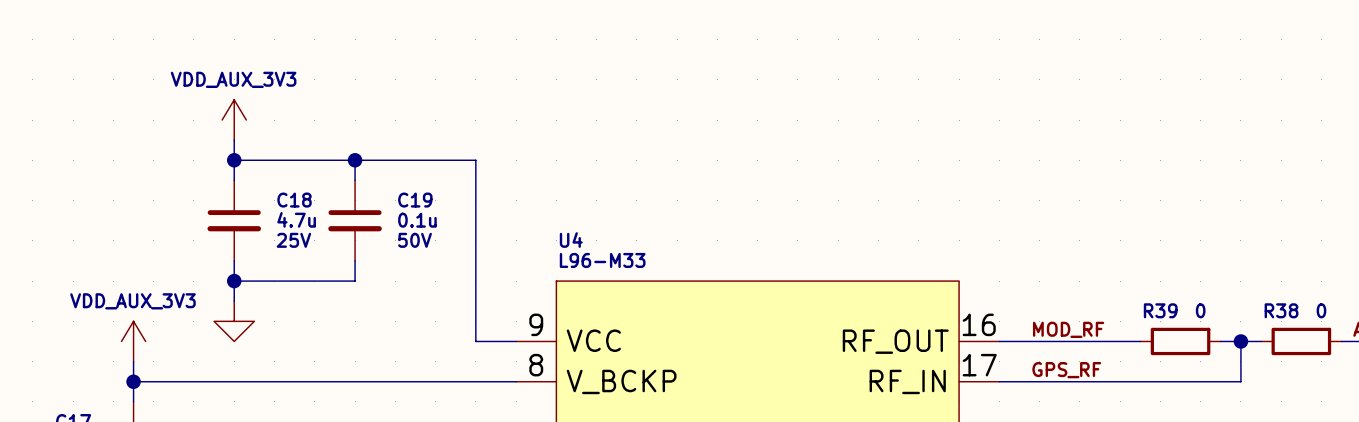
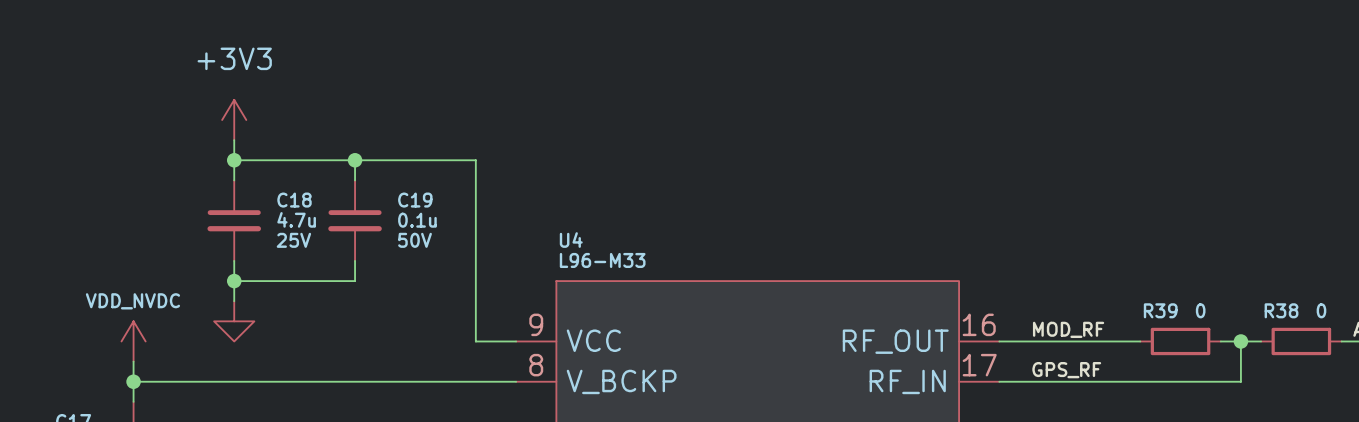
power symbol: VDD_AUX_3V3 (234, 120) -> +3V3 (234, 120)
power symbol: VDD_AUX_3V3 (133, 341) -> VDD_NVDC (133, 341)

